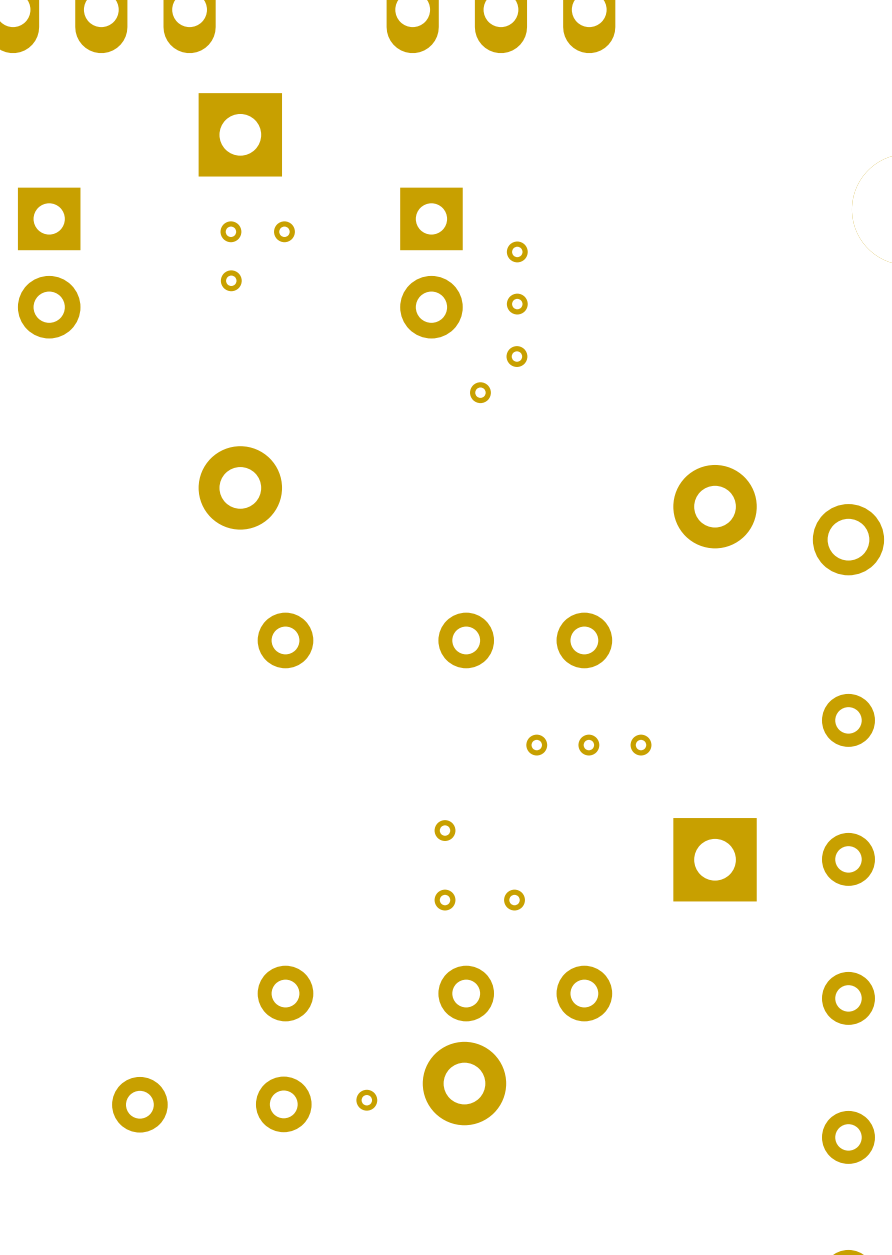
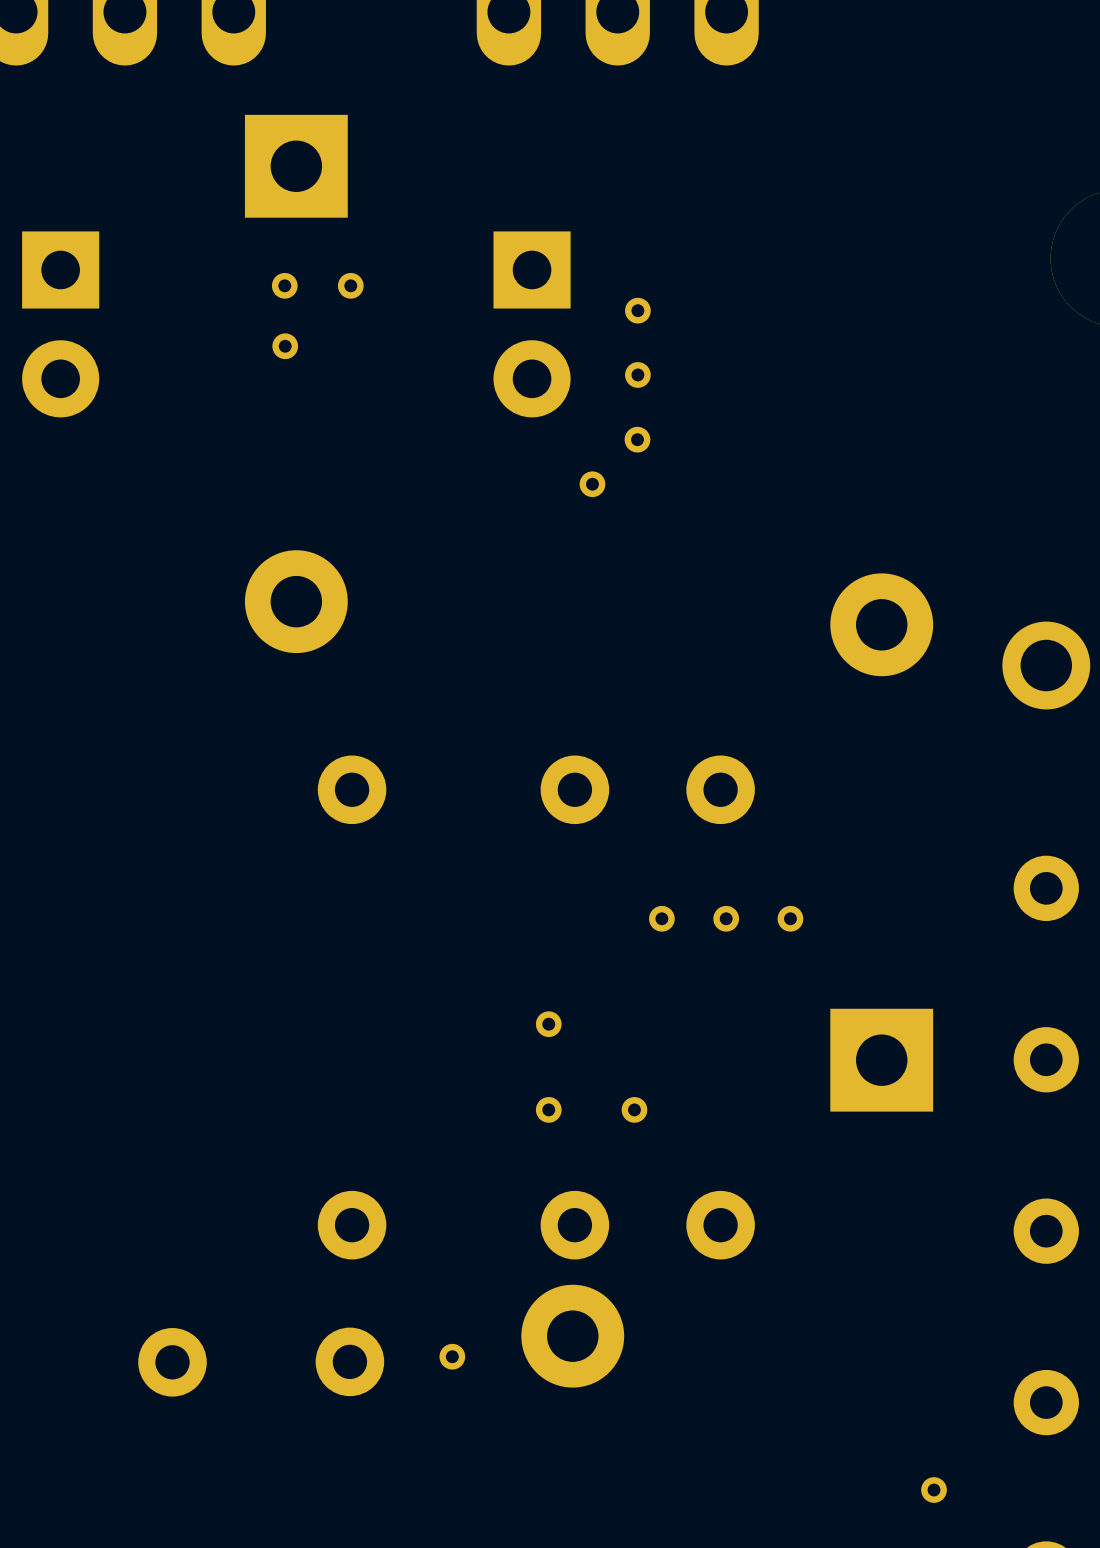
part: none -> (934, 1490)

